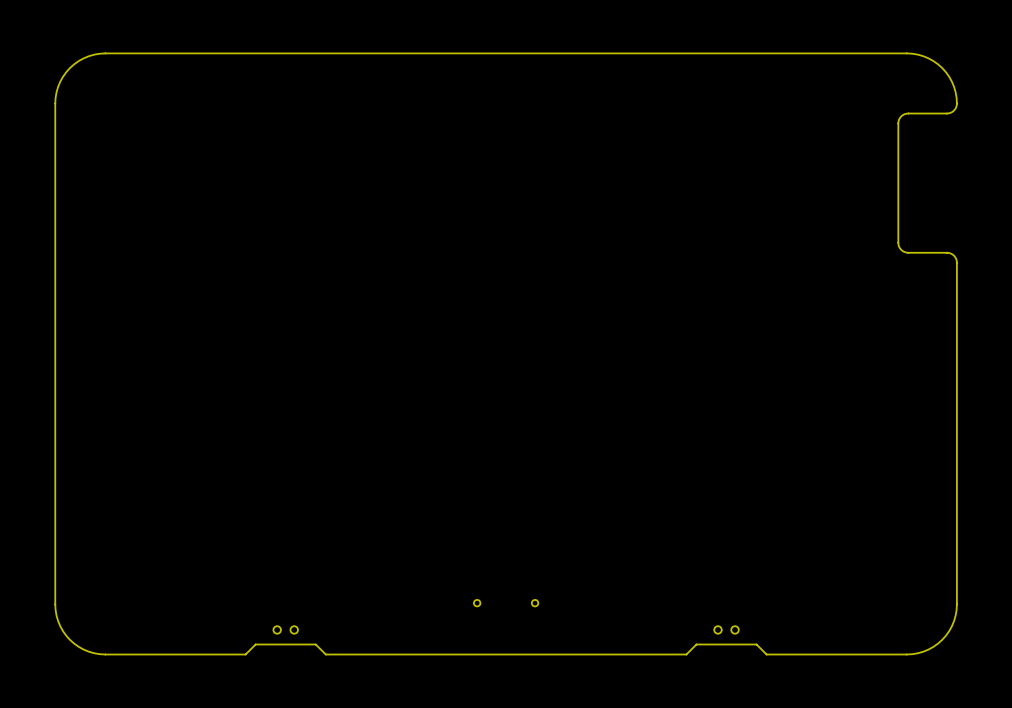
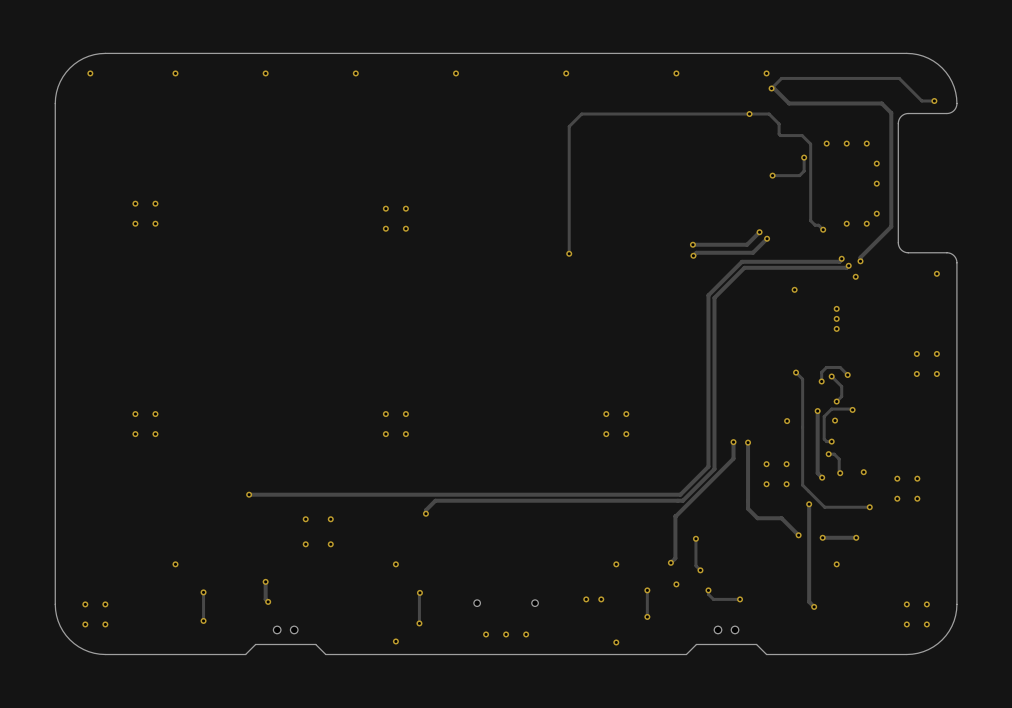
via: none -> (90, 73)
via: none -> (175, 73)
via: none -> (265, 73)
via: none -> (355, 73)
via: none -> (456, 73)
via: none -> (566, 73)
via: none -> (676, 73)
via: none -> (766, 73)
via: none -> (771, 88)
track: none -> (934, 100) (921, 100) (899, 78) (781, 78) (771, 88) (774, 88) (789, 103) (881, 103) (891, 113) (891, 226) (860, 257) (860, 261)
via: none -> (934, 100)
via: none -> (749, 114)
via: none -> (826, 143)
via: none -> (846, 143)
via: none -> (866, 143)
track: none -> (804, 157) (804, 171) (799, 175) (772, 175)
via: none -> (804, 157)
via: none -> (876, 163)
via: none -> (772, 175)
via: none -> (876, 183)
via: none -> (135, 203)
via: none -> (155, 203)
via: none -> (385, 208)
via: none -> (405, 208)
via: none -> (876, 213)
via: none -> (135, 223)
via: none -> (155, 223)
via: none -> (846, 223)
via: none -> (866, 223)
via: none -> (385, 228)
via: none -> (405, 228)
track: none -> (823, 229) (810, 220) (810, 144) (802, 135) (780, 135) (779, 124) (769, 114) (581, 114) (569, 126) (569, 253)
via: none -> (823, 229)
track: none -> (759, 232) (747, 244) (692, 244)
via: none -> (759, 232)
track: none -> (767, 238) (753, 252) (696, 252) (693, 255)
via: none -> (767, 238)
via: none -> (692, 244)
via: none -> (569, 253)
via: none -> (693, 255)
track: none -> (841, 258) (839, 261) (742, 261) (708, 295) (708, 466) (680, 494) (249, 494)
via: none -> (841, 258)
via: none -> (860, 261)
track: none -> (848, 265) (846, 267) (744, 267) (714, 297) (714, 469) (682, 500) (435, 500) (425, 510) (425, 513)
via: none -> (848, 265)
via: none -> (936, 273)
via: none -> (855, 276)
via: none -> (794, 289)
via: none -> (836, 308)
via: none -> (836, 318)
via: none -> (836, 328)
via: none -> (916, 353)
via: none -> (936, 353)
track: none -> (796, 372) (802, 379) (802, 485) (824, 507) (869, 507)
via: none -> (796, 372)
via: none -> (916, 373)
via: none -> (936, 373)
track: none -> (847, 374) (840, 367) (826, 367) (821, 372) (821, 381)
via: none -> (847, 374)
track: none -> (831, 376) (841, 386) (841, 396) (836, 401)
via: none -> (831, 376)
via: none -> (821, 381)
via: none -> (836, 401)
track: none -> (852, 409) (831, 409) (824, 416) (824, 439) (826, 441) (831, 441)
via: none -> (852, 409)
track: none -> (817, 411) (817, 473) (822, 477)
via: none -> (817, 411)
via: none -> (135, 414)
via: none -> (155, 414)
via: none -> (385, 414)
via: none -> (405, 414)
via: none -> (606, 414)
via: none -> (626, 414)
via: none -> (835, 420)
via: none -> (787, 421)
via: none -> (135, 434)
via: none -> (155, 434)
via: none -> (385, 434)
via: none -> (405, 434)
via: none -> (606, 434)
via: none -> (626, 434)
via: none -> (831, 441)
track: none -> (733, 442) (733, 458) (675, 516) (675, 558) (670, 562)
via: none -> (733, 442)
track: none -> (748, 442) (748, 508) (757, 518) (781, 518) (798, 535)
via: none -> (748, 442)
track: none -> (828, 454) (834, 454) (839, 459) (840, 473)
via: none -> (828, 454)
via: none -> (766, 464)
via: none -> (786, 464)
via: none -> (863, 472)
via: none -> (840, 473)
via: none -> (822, 477)
via: none -> (897, 478)
via: none -> (917, 478)
via: none -> (766, 484)
via: none -> (786, 484)
via: none -> (249, 494)
via: none -> (897, 498)
via: none -> (917, 498)
track: none -> (809, 504) (809, 601) (814, 606)
via: none -> (809, 504)
via: none -> (869, 507)
via: none -> (425, 513)
via: none -> (305, 519)
via: none -> (330, 519)
via: none -> (798, 535)
via: none -> (822, 537)
track: none -> (856, 537) (822, 537)
via: none -> (856, 537)
track: none -> (695, 538) (695, 565) (700, 570)
via: none -> (695, 538)
via: none -> (305, 544)
via: none -> (330, 544)
via: none -> (670, 562)
via: none -> (175, 564)
via: none -> (395, 564)
via: none -> (616, 564)
via: none -> (836, 564)
via: none -> (700, 570)
track: none -> (265, 581) (265, 599) (268, 601)
via: none -> (265, 581)
via: none -> (676, 584)
track: none -> (647, 590) (647, 616)
via: none -> (647, 590)
track: none -> (708, 590) (708, 594) (713, 599) (740, 599)
via: none -> (708, 590)
track: none -> (203, 592) (203, 620)
via: none -> (203, 592)
track: none -> (419, 592) (419, 623)
via: none -> (419, 592)
via: none -> (586, 599)
via: none -> (601, 599)
via: none -> (740, 599)
via: none -> (268, 601)
via: none -> (85, 604)
via: none -> (105, 604)
via: none -> (906, 604)
via: none -> (926, 604)
via: none -> (814, 606)
via: none -> (647, 616)
via: none -> (203, 620)
via: none -> (419, 623)
via: none -> (85, 624)
via: none -> (105, 624)
via: none -> (906, 624)
via: none -> (926, 624)
via: none -> (486, 634)
via: none -> (506, 634)
via: none -> (526, 634)
via: none -> (395, 641)
via: none -> (616, 642)

